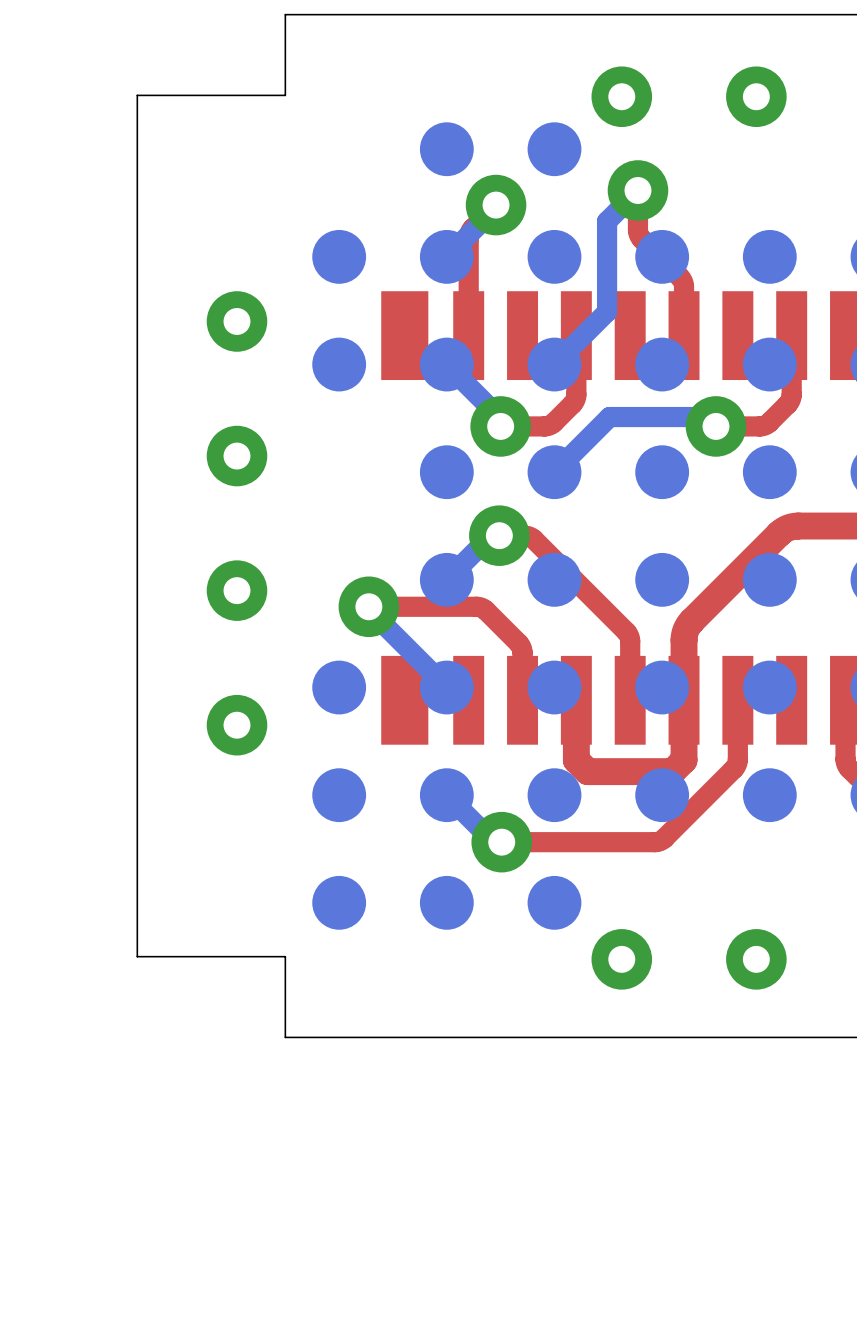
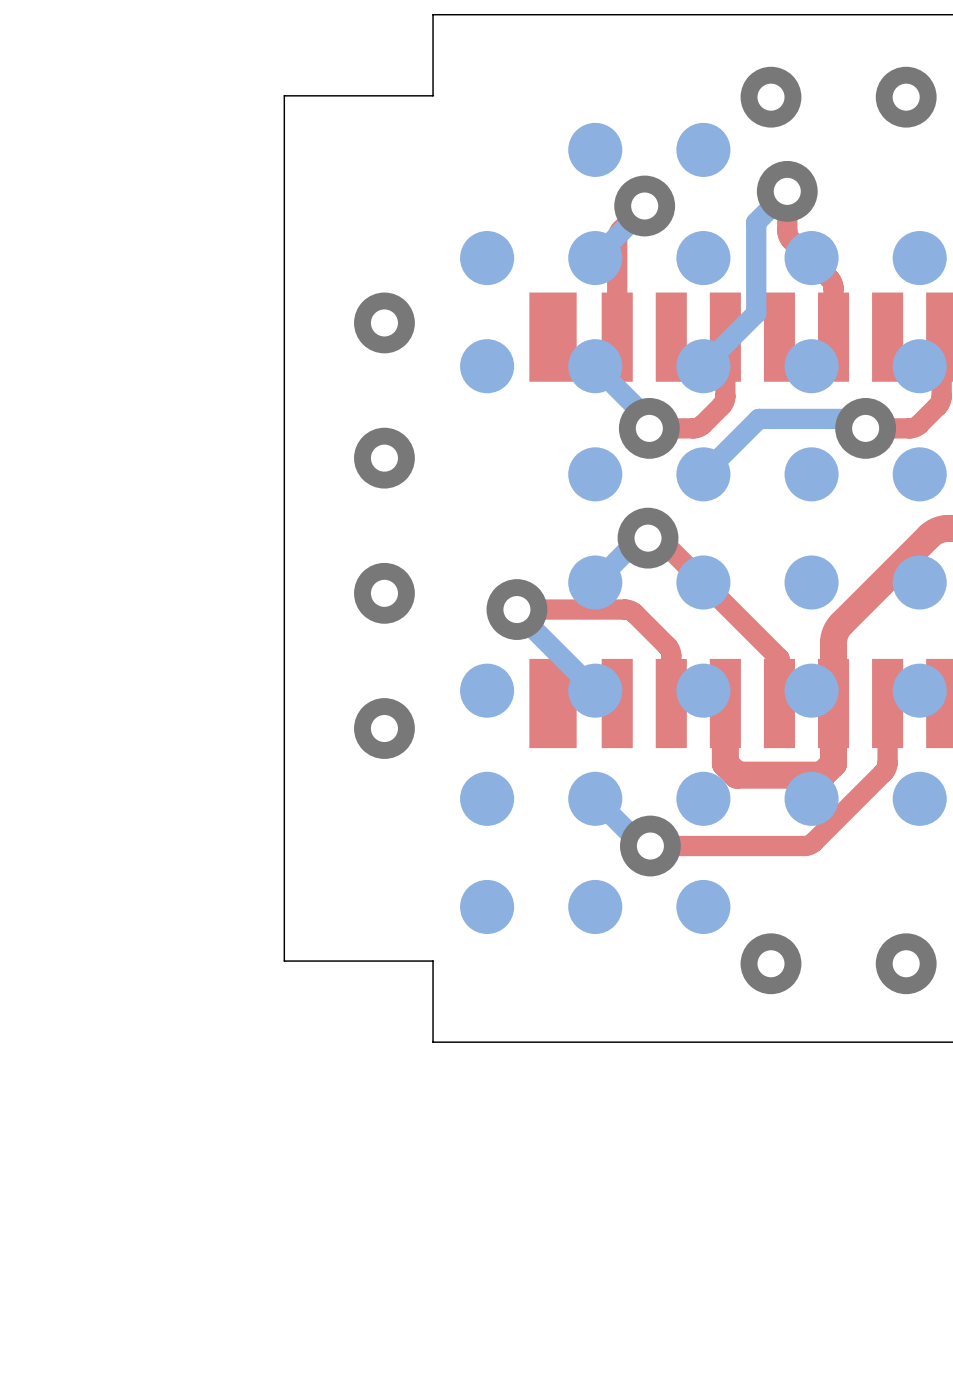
top track: (499, 535) (526, 535) (534, 539) (627, 632) (630, 639) (630, 655) -> (663, 528) (649, 528) (779, 658)

